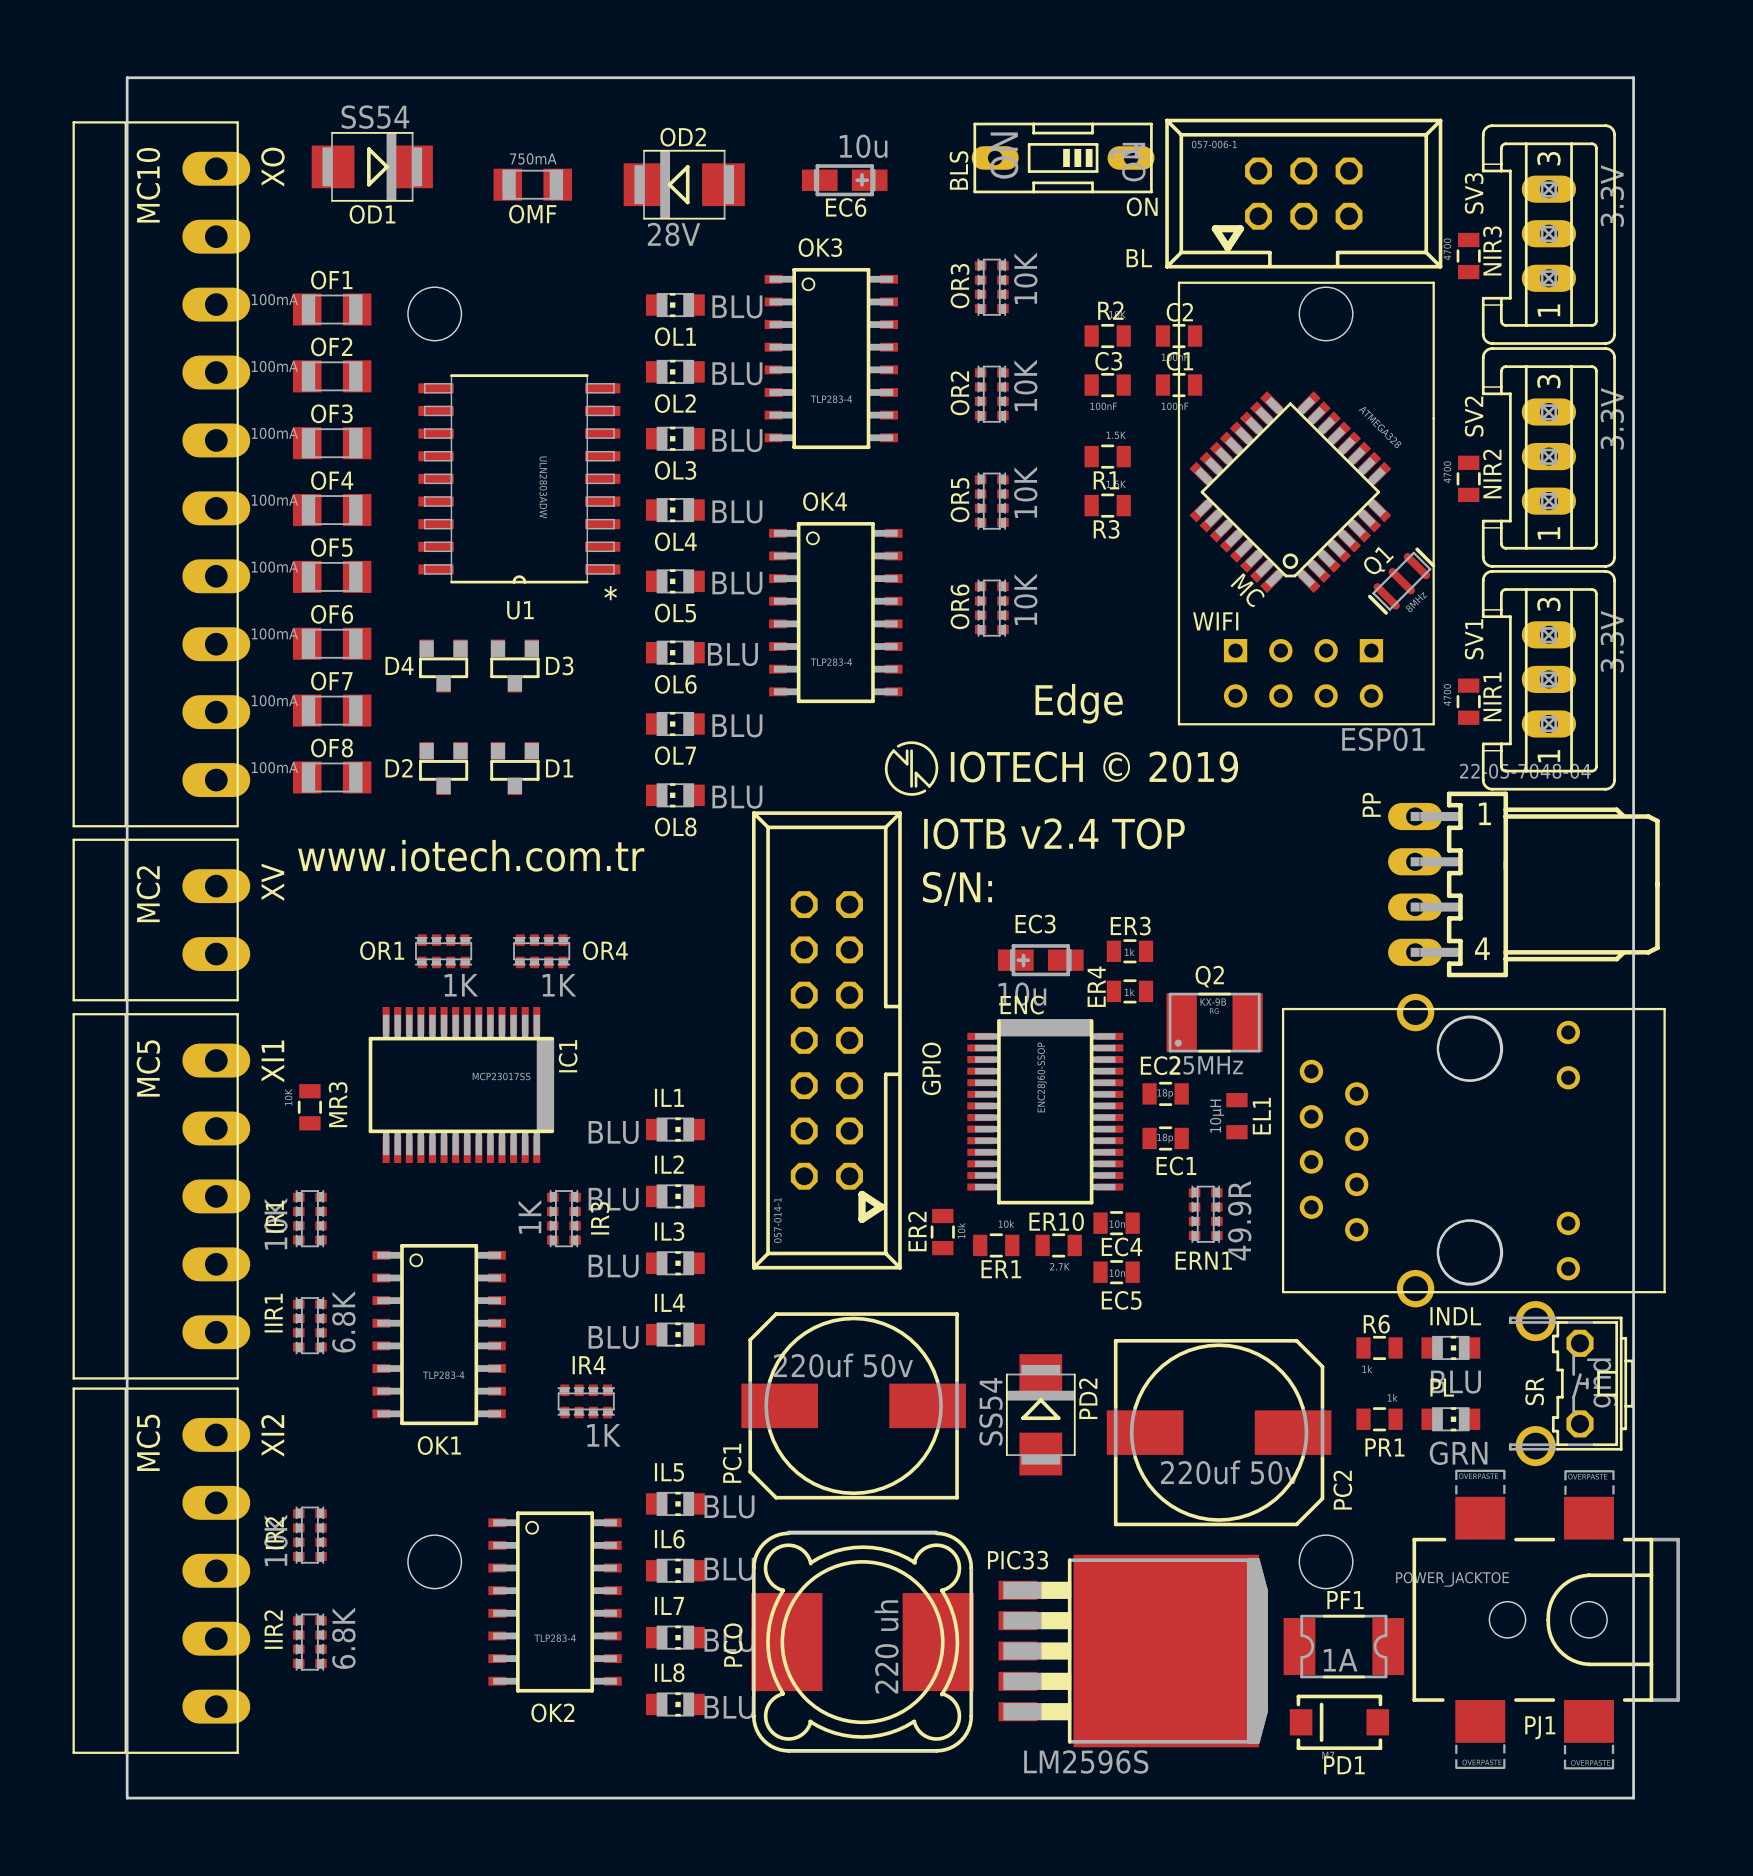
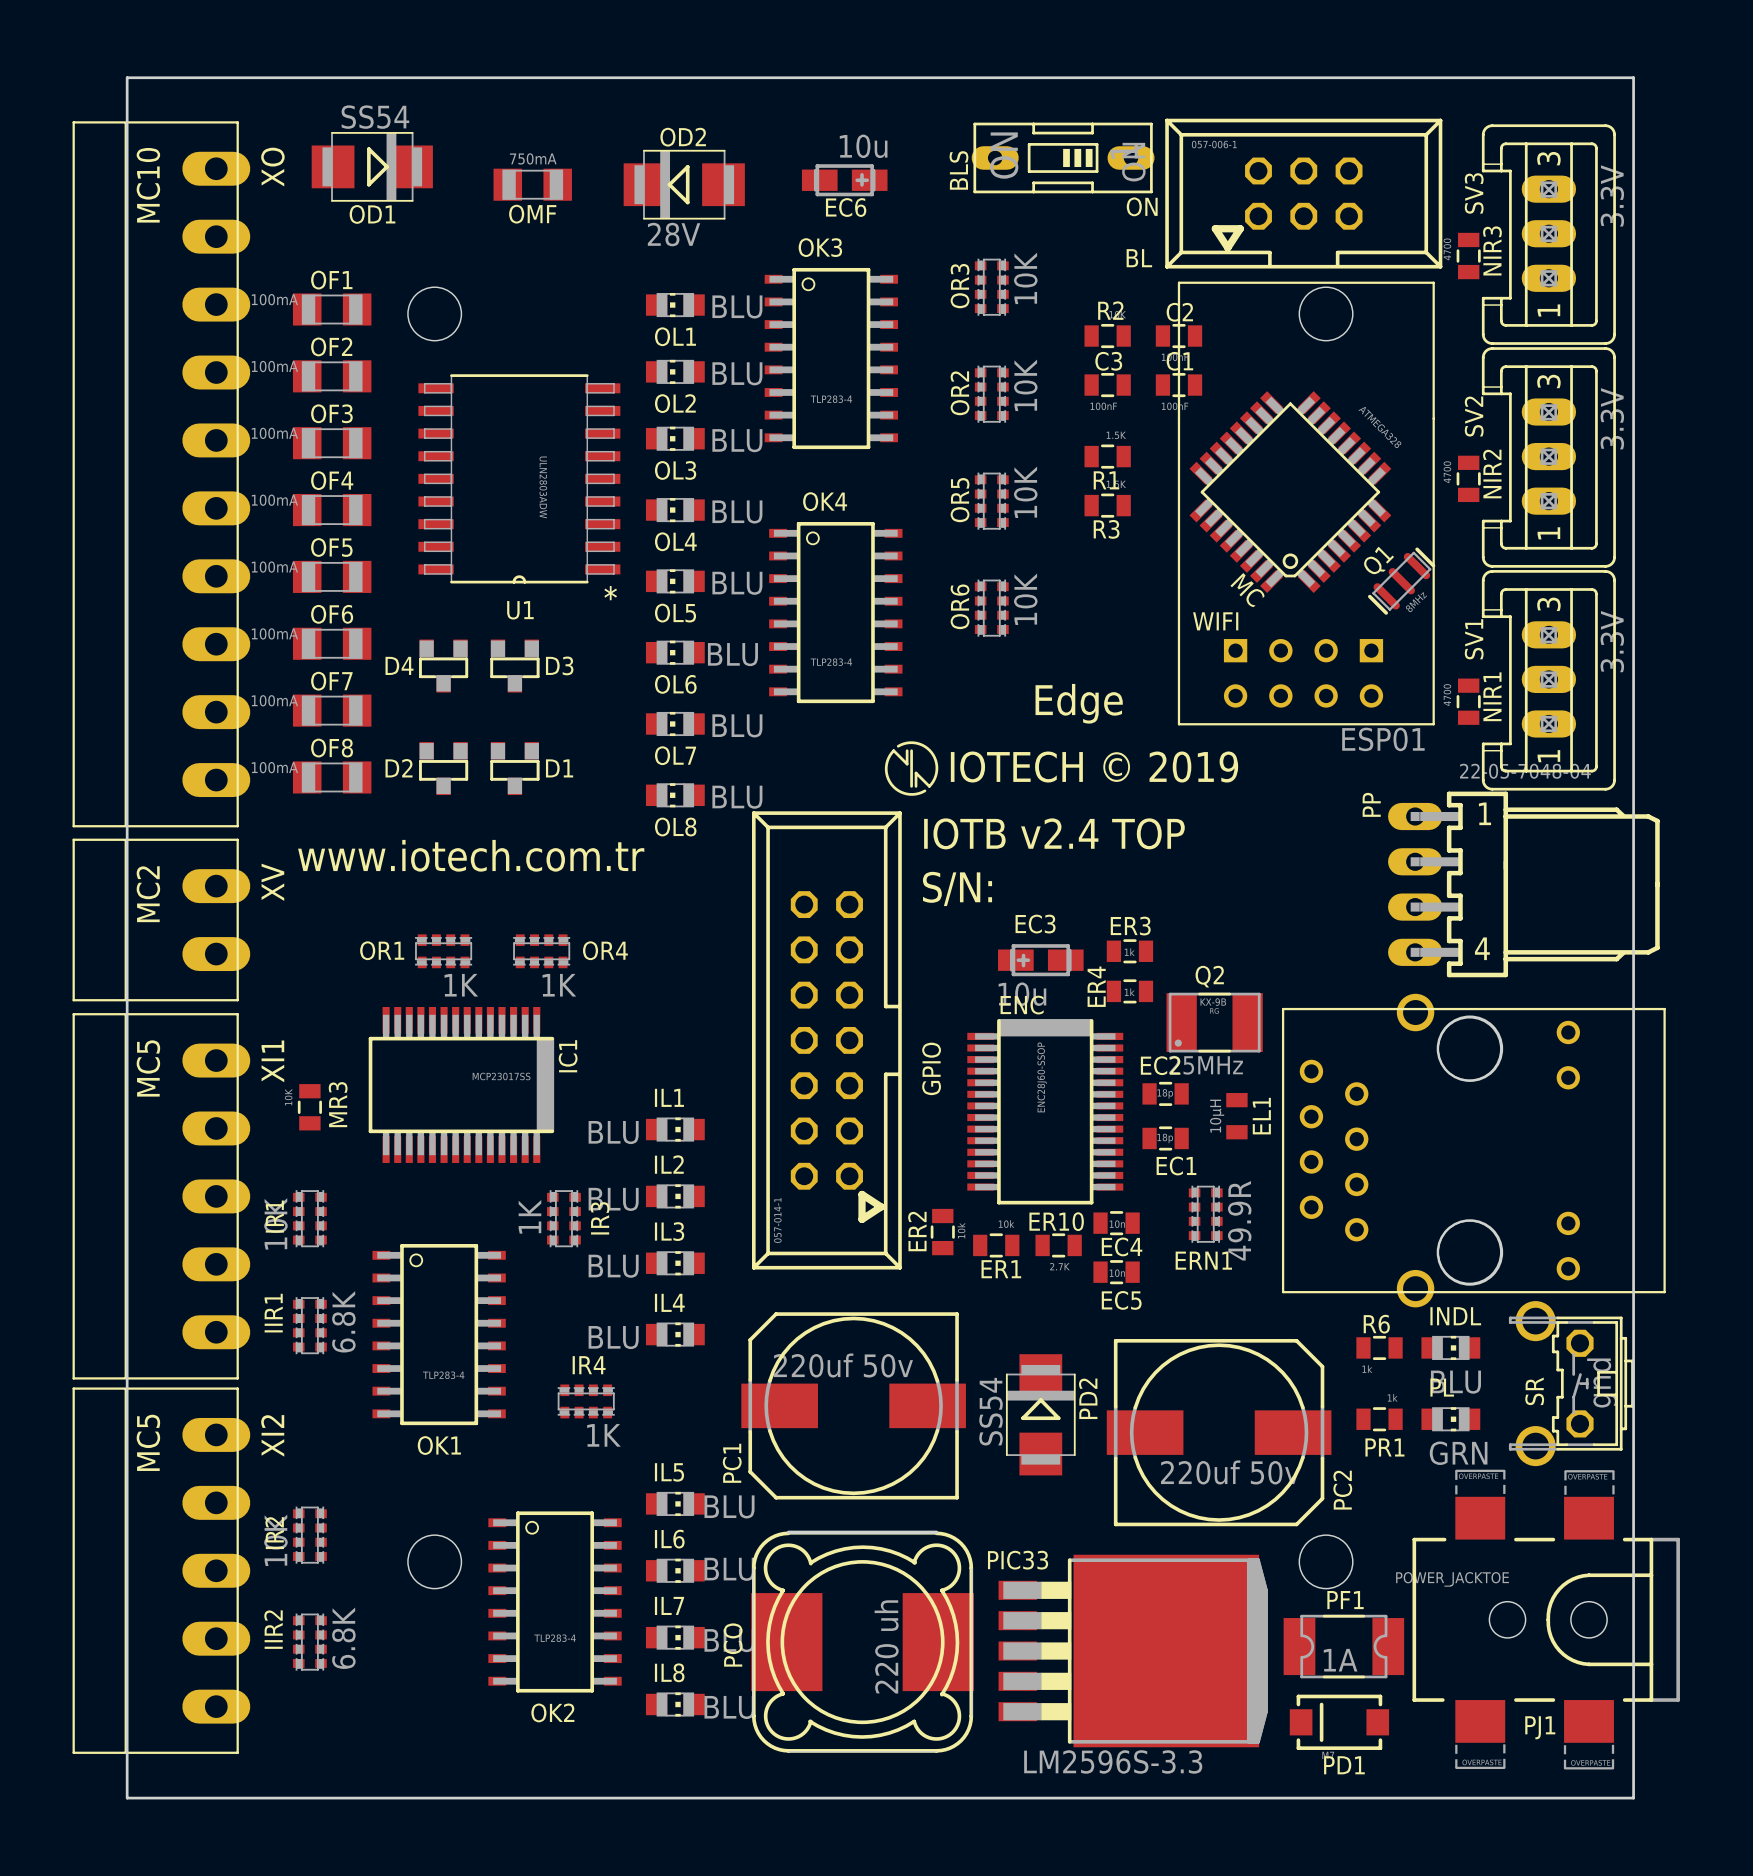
PIC33 value: LM2596S (1086, 1761) -> LM2596S-3.3 (1113, 1761)

